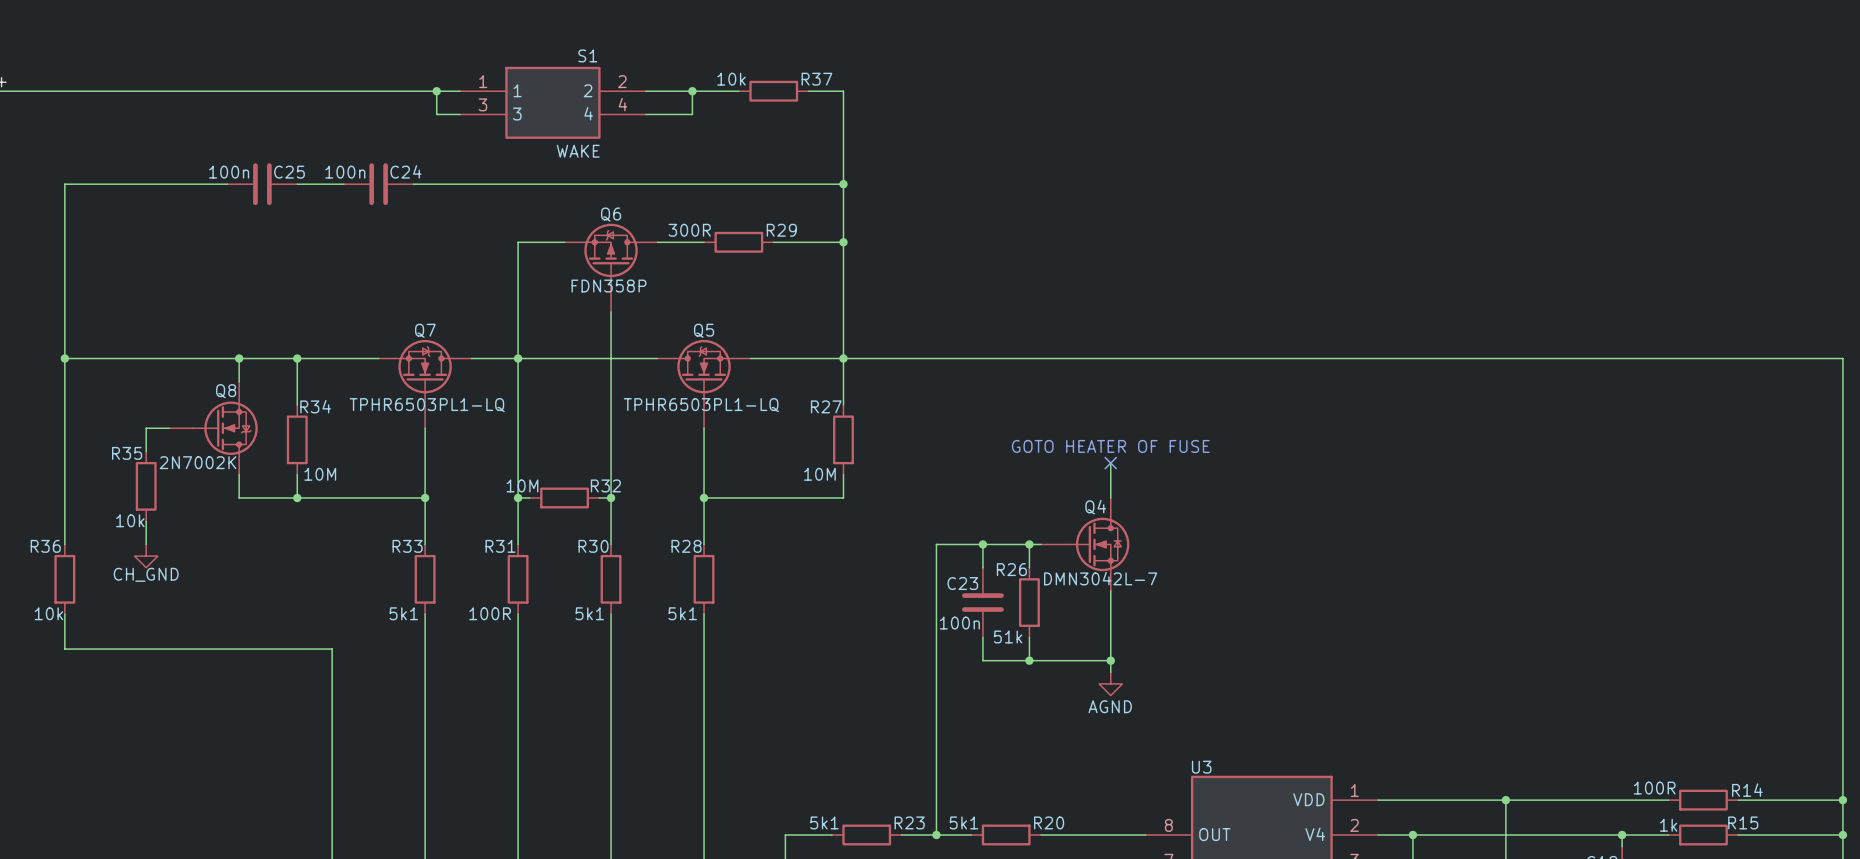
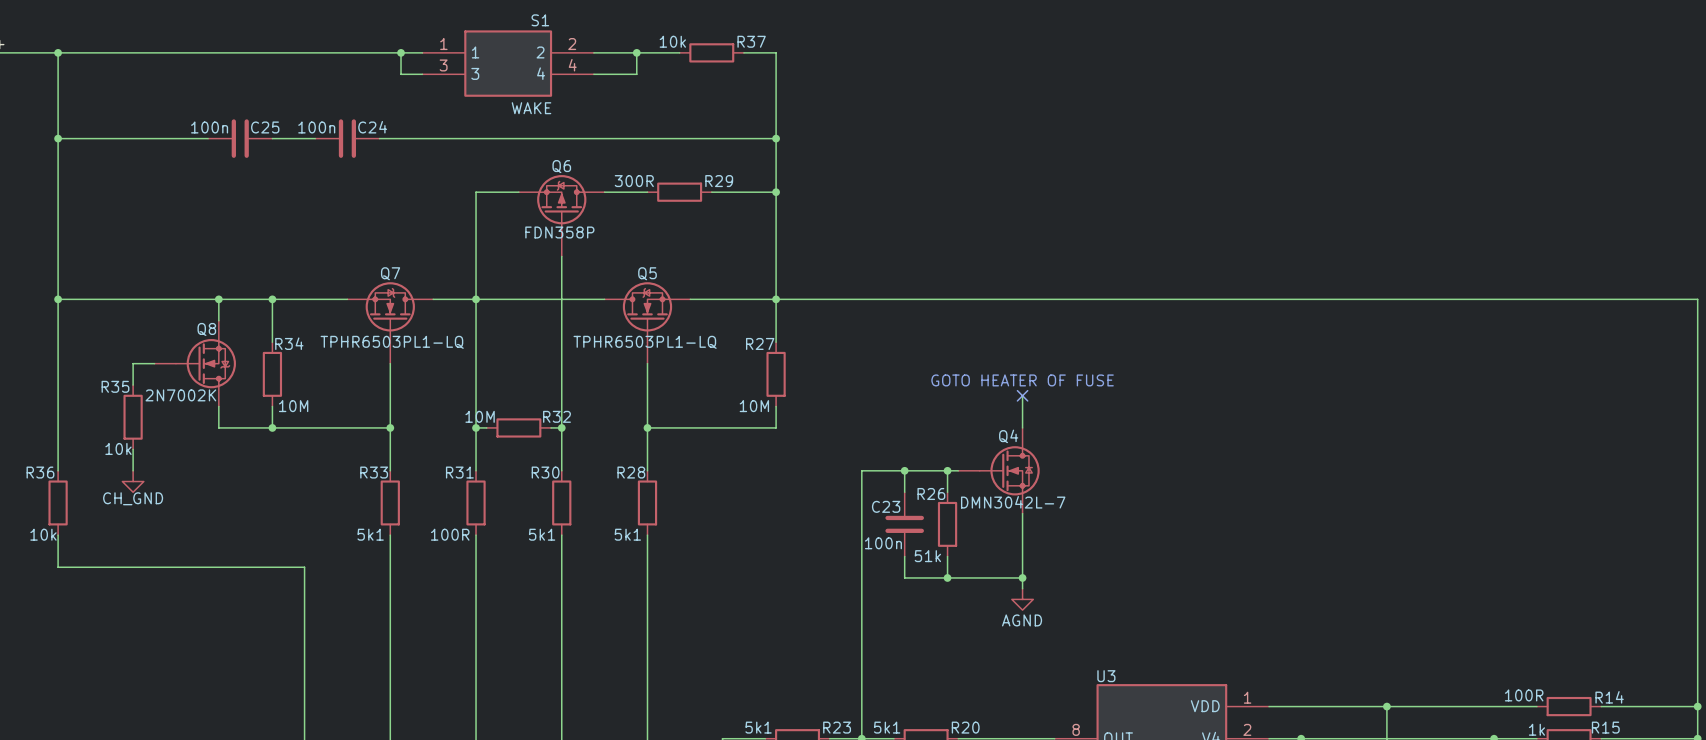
wire: none -> (58, 52) (58, 138)
junction: none -> (58, 52)
junction: none -> (58, 138)

